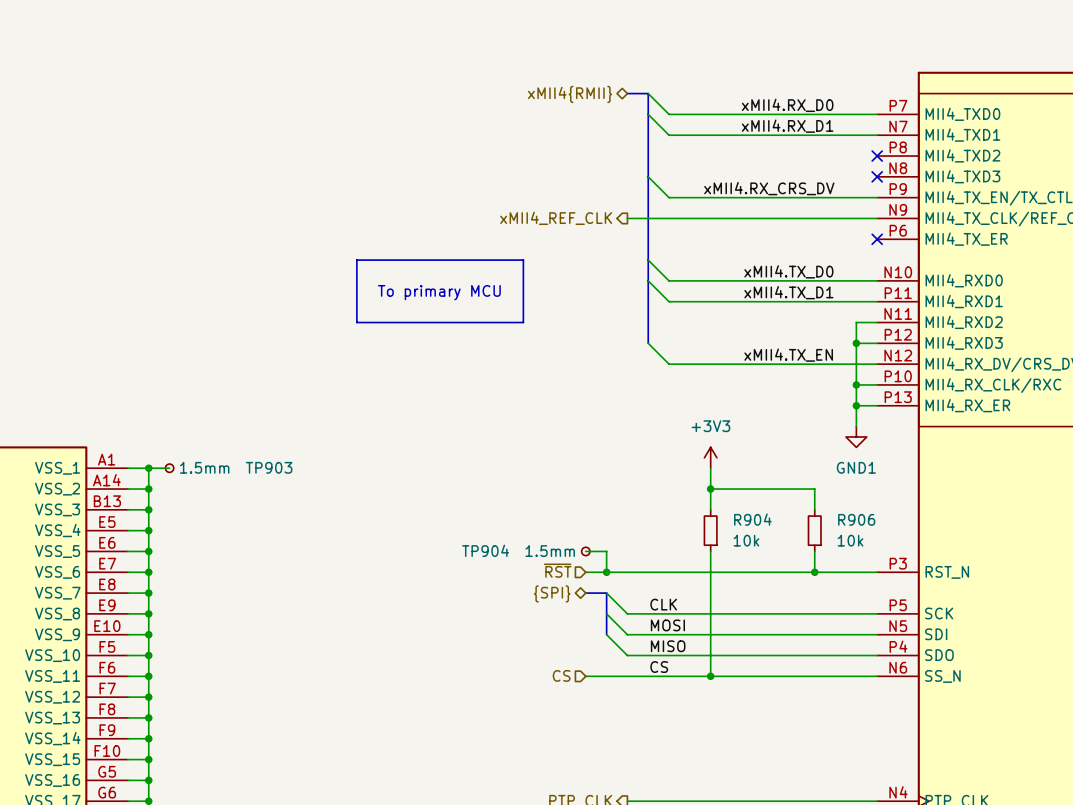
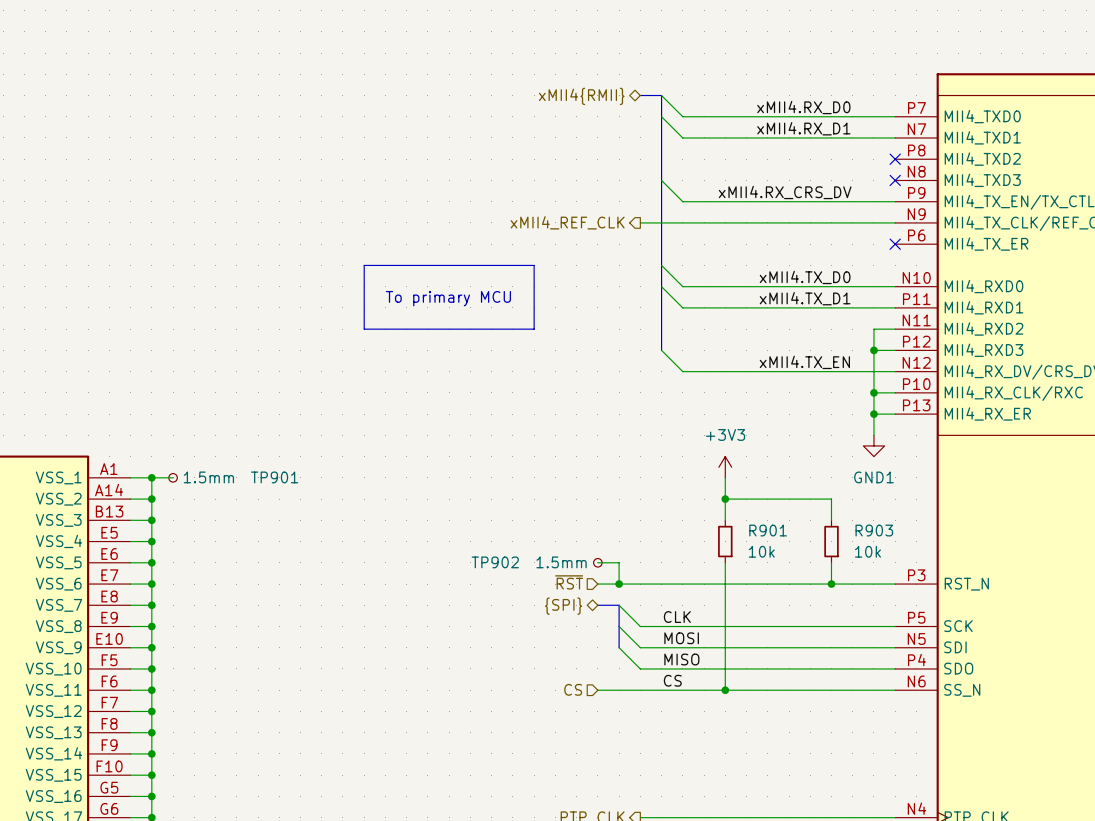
TP903 name: TP903 (269, 467) -> TP901 (274, 477)
R904 name: R904 (752, 519) -> R901 (768, 530)
R906 name: R906 (856, 519) -> R903 (874, 530)
TP904 name: TP904 (485, 550) -> TP902 (495, 562)

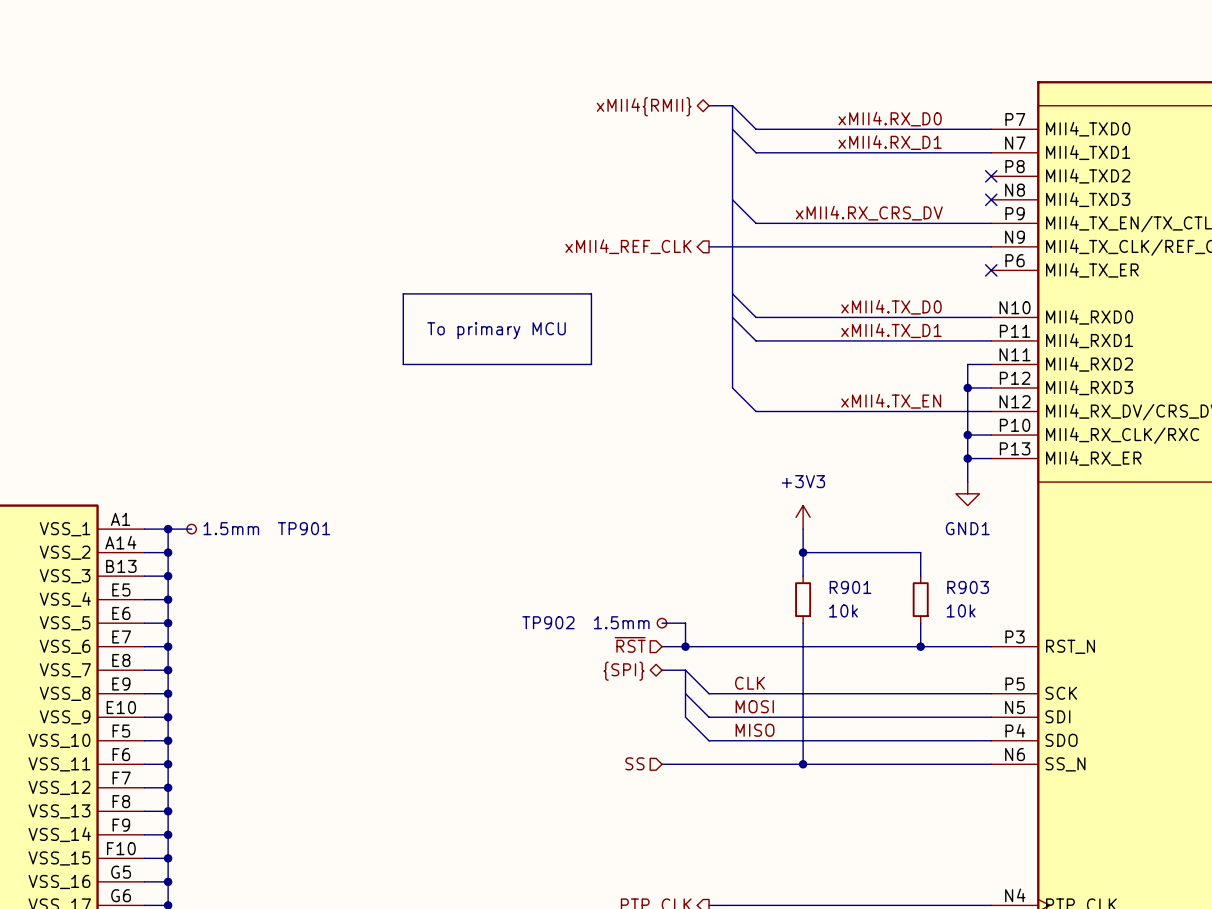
label: CS (672, 680) -> none
hierarchical label: CS (573, 689) -> SS (634, 763)

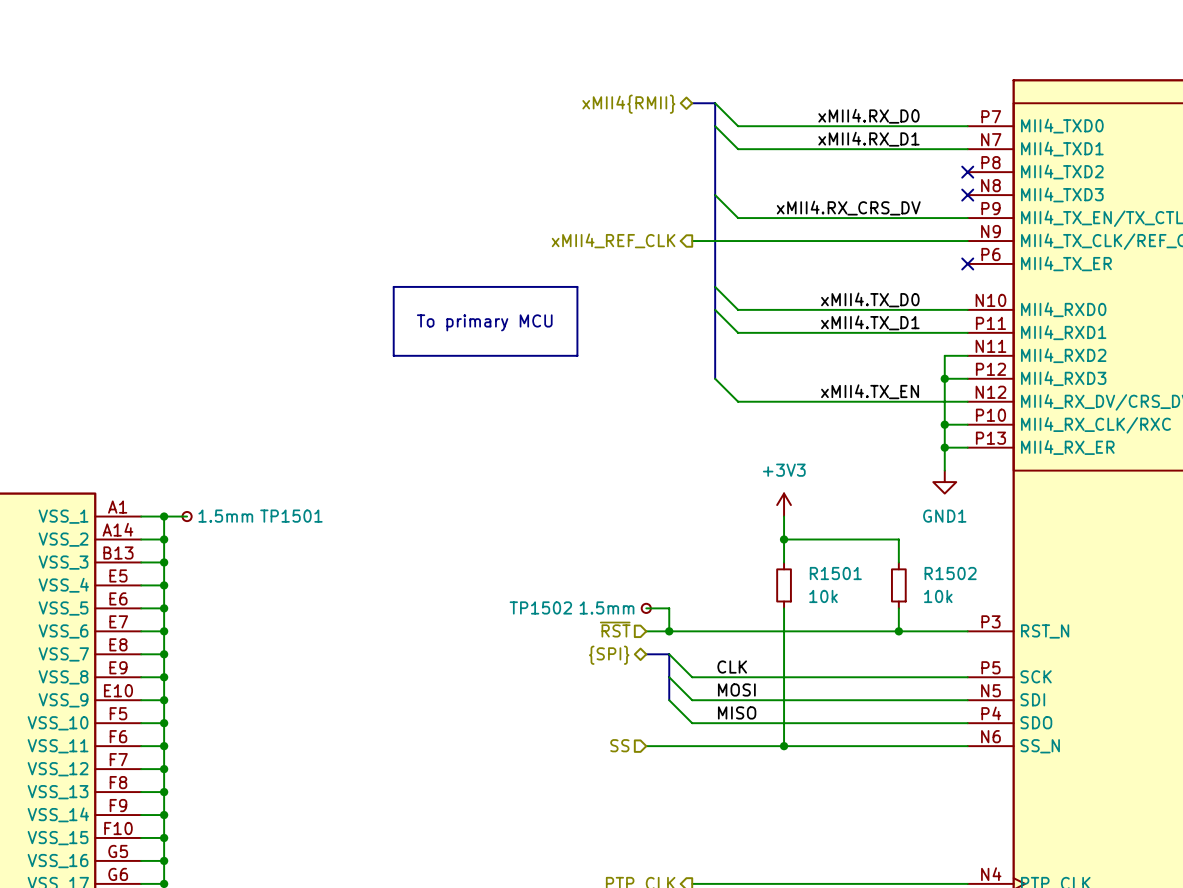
TP901 name: TP901 (304, 528) -> TP1501 (291, 516)
R901 name: R901 (850, 587) -> R1501 (835, 573)
R903 name: R903 (968, 587) -> R1502 (950, 573)
TP902 name: TP902 (548, 622) -> TP1502 (540, 607)

